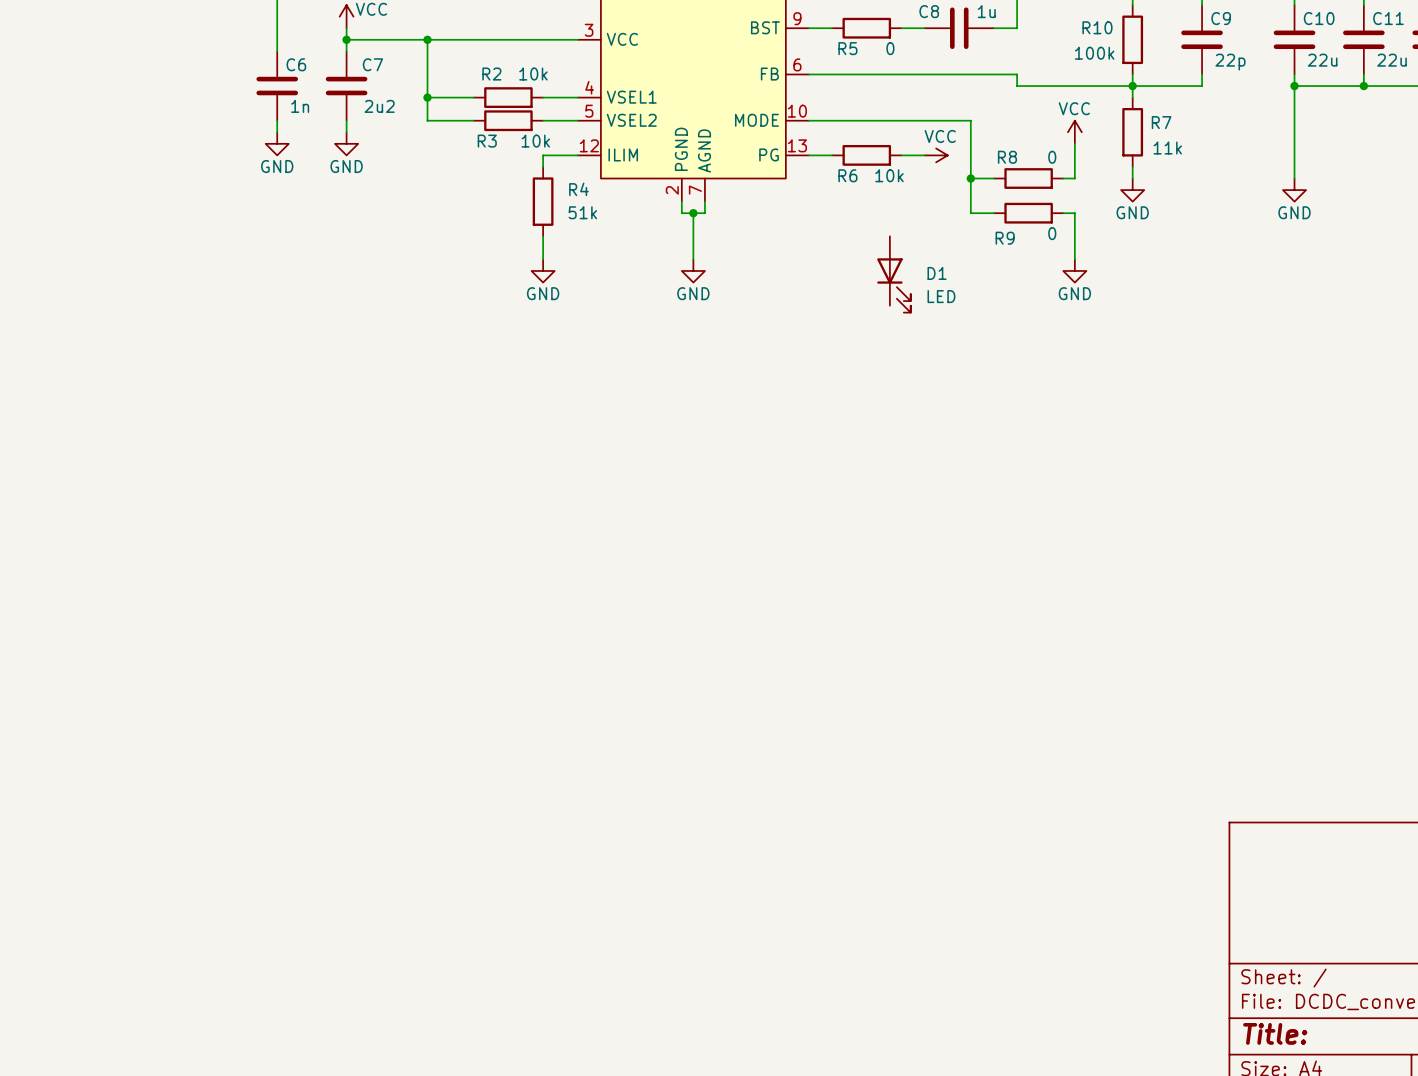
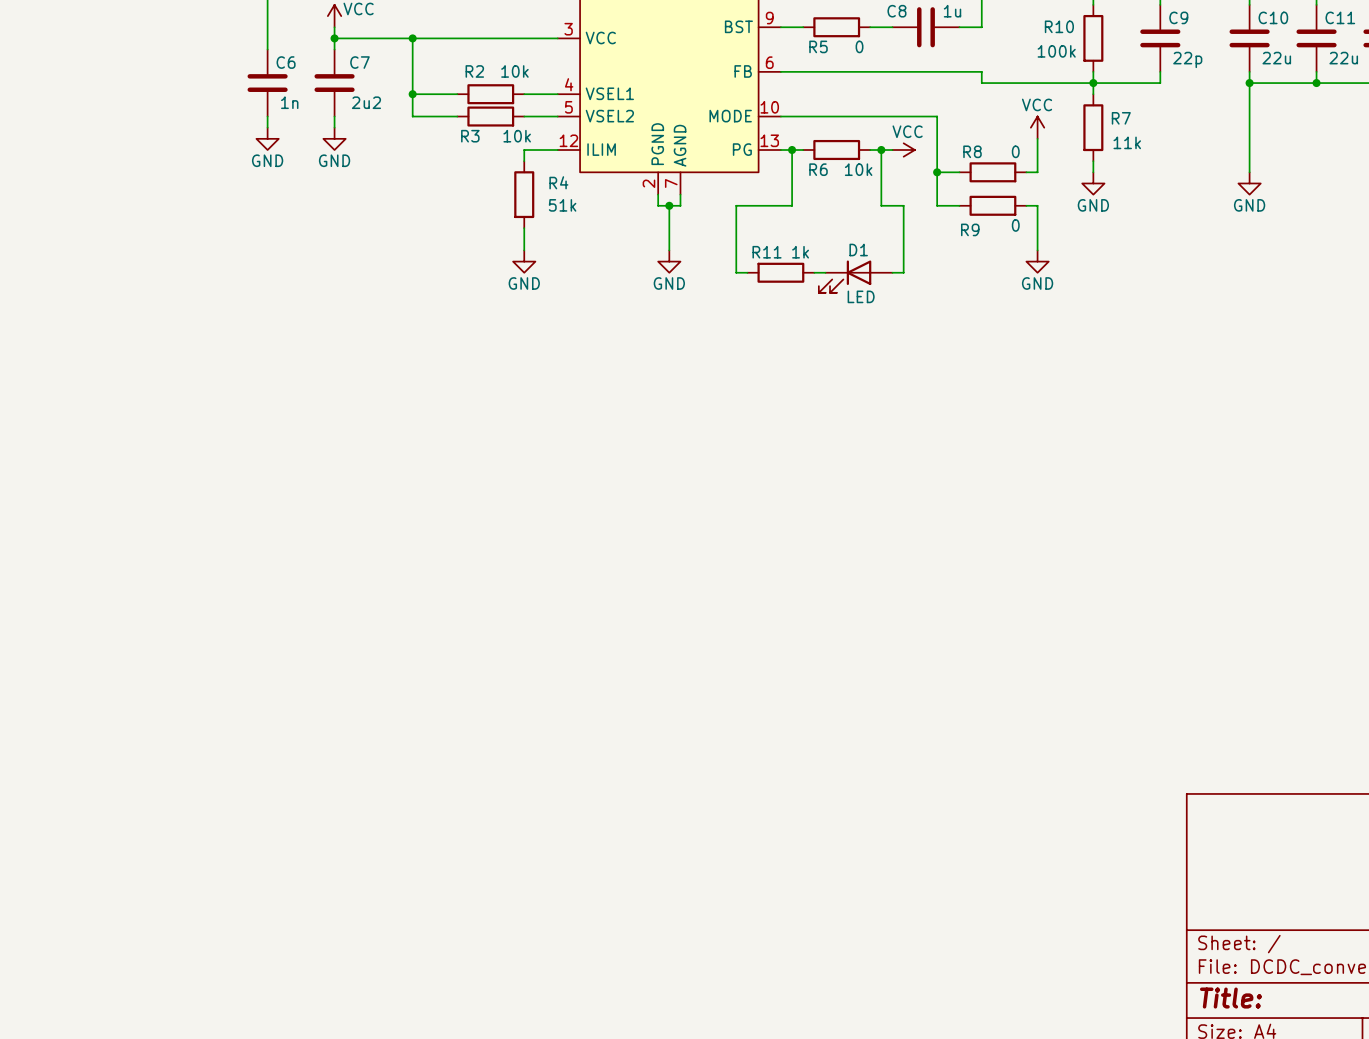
wire: none -> (792, 150) (792, 205) (736, 205) (736, 272) (747, 272)
junction: none -> (792, 150)
wire: none -> (881, 150) (881, 205) (903, 205) (903, 272) (892, 272)
junction: none -> (881, 150)
D1 name position: D1 (937, 273) -> D1 (858, 250)
R11: none -> 1k (780, 272)
wire: none -> (814, 272) (825, 272)
D1 rotation: 0° (893, 285) -> 90° clockwise (845, 276)
D1 value position: LED (941, 296) -> LED (861, 296)

